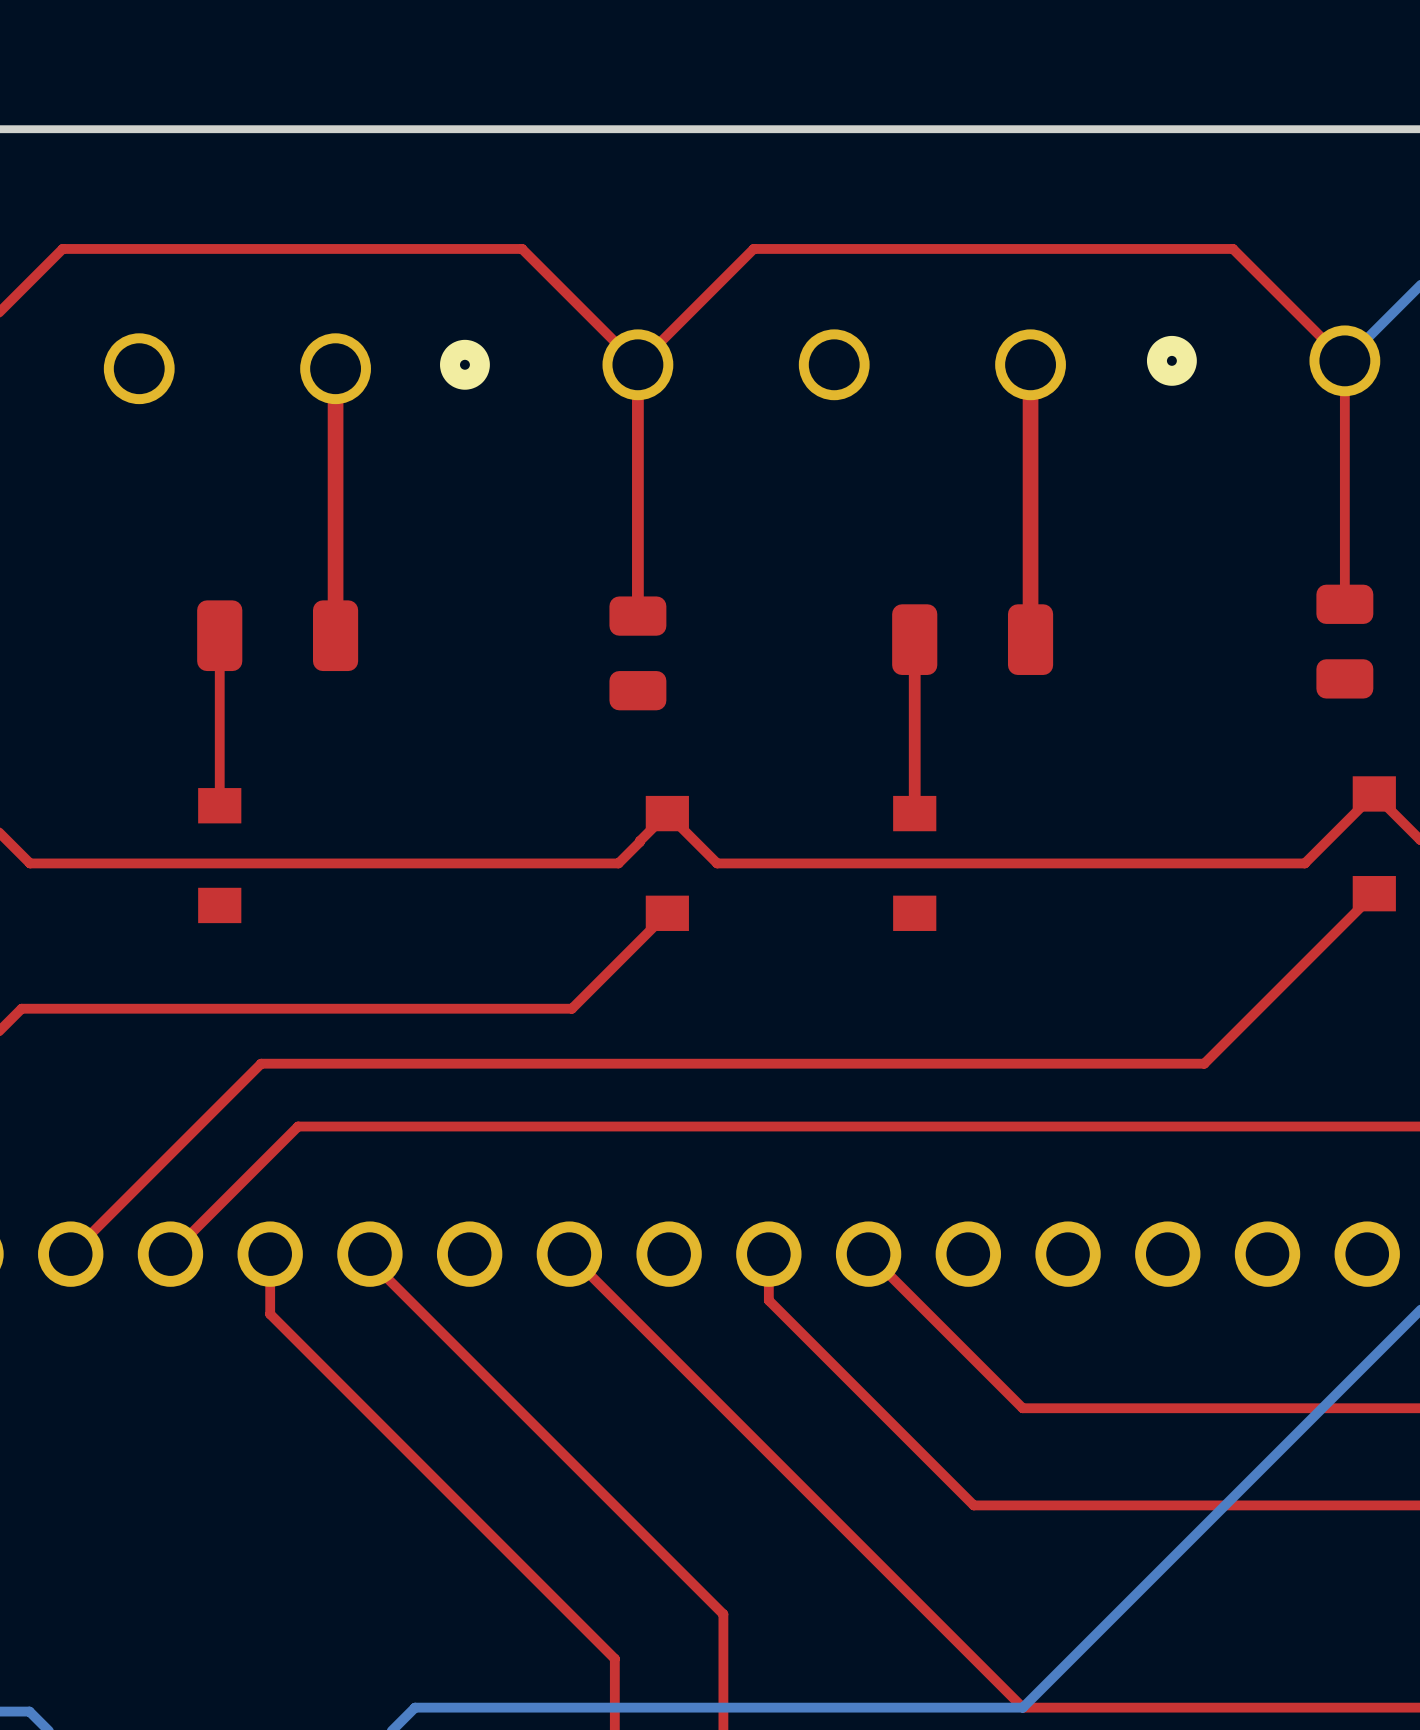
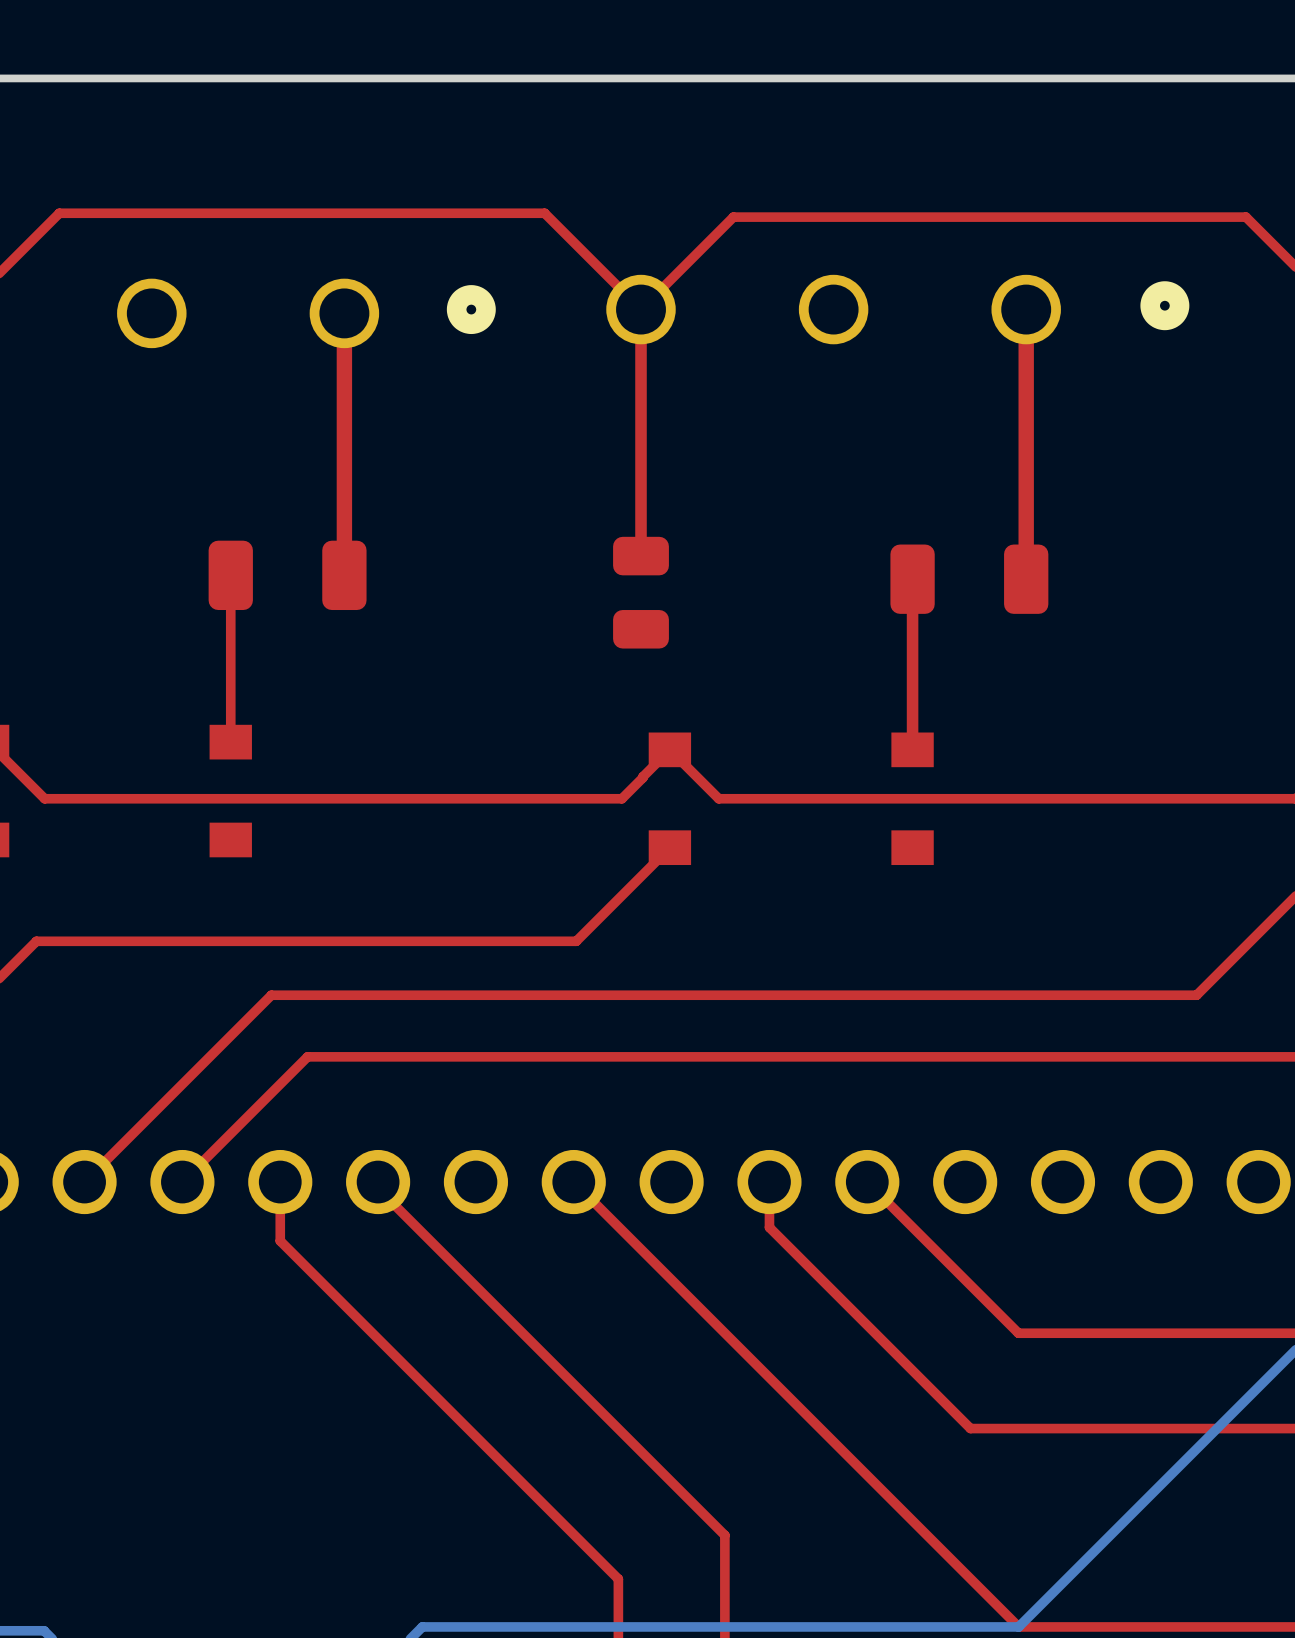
top track: (539, 266) (522, 248) (62, 248) (45, 266) -> (544, 213) (59, 213)
top track: (1254, 270) (1232, 248) (753, 248) (732, 270) -> (1245, 217) (733, 217)

